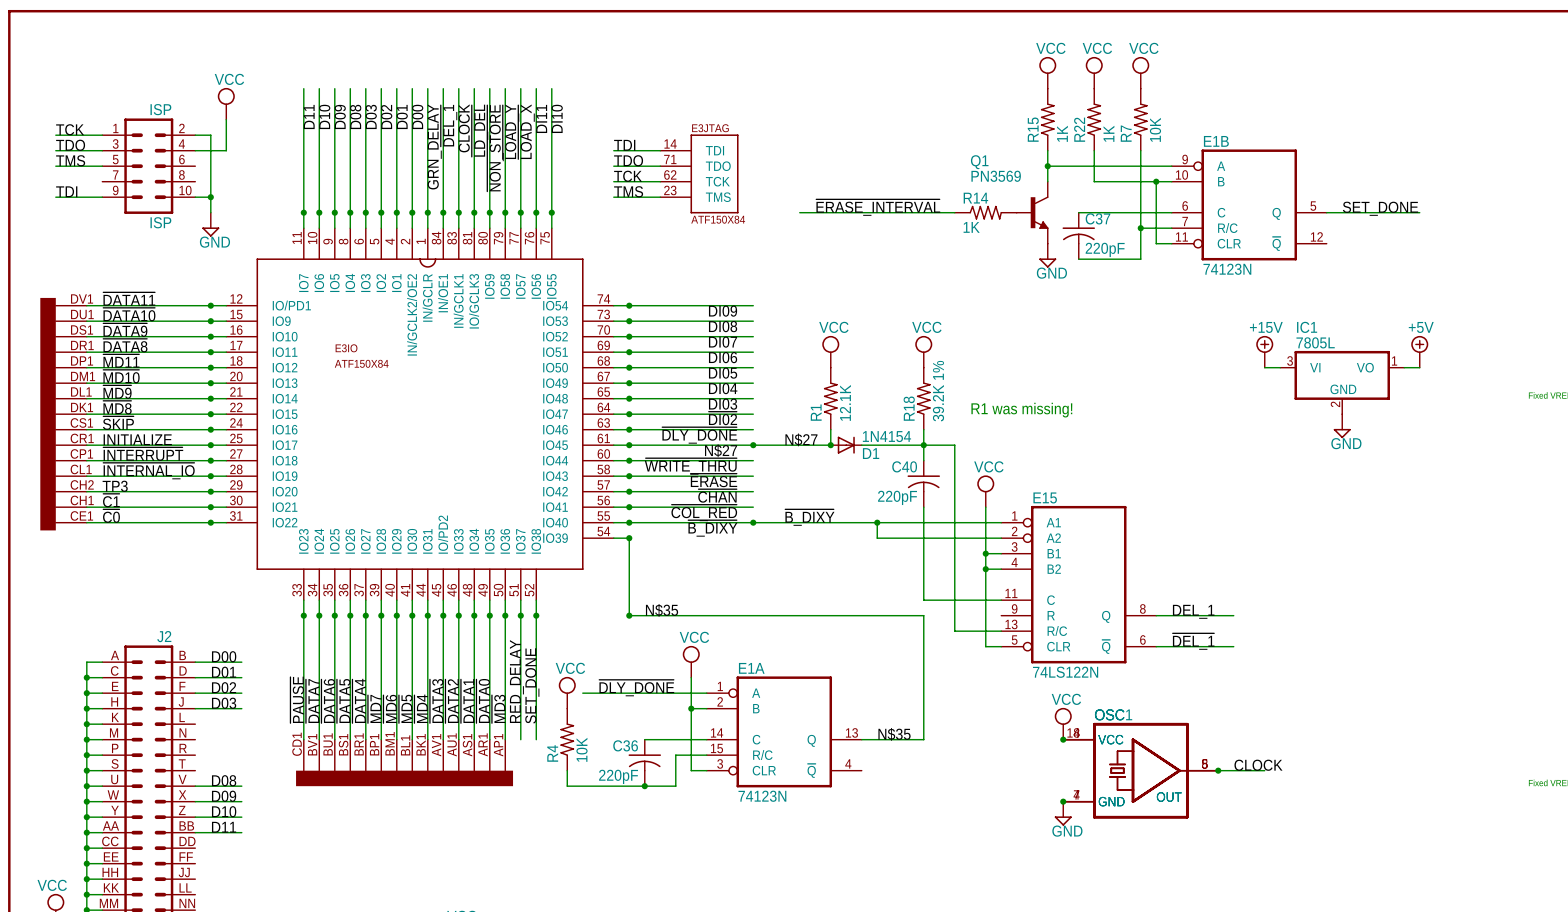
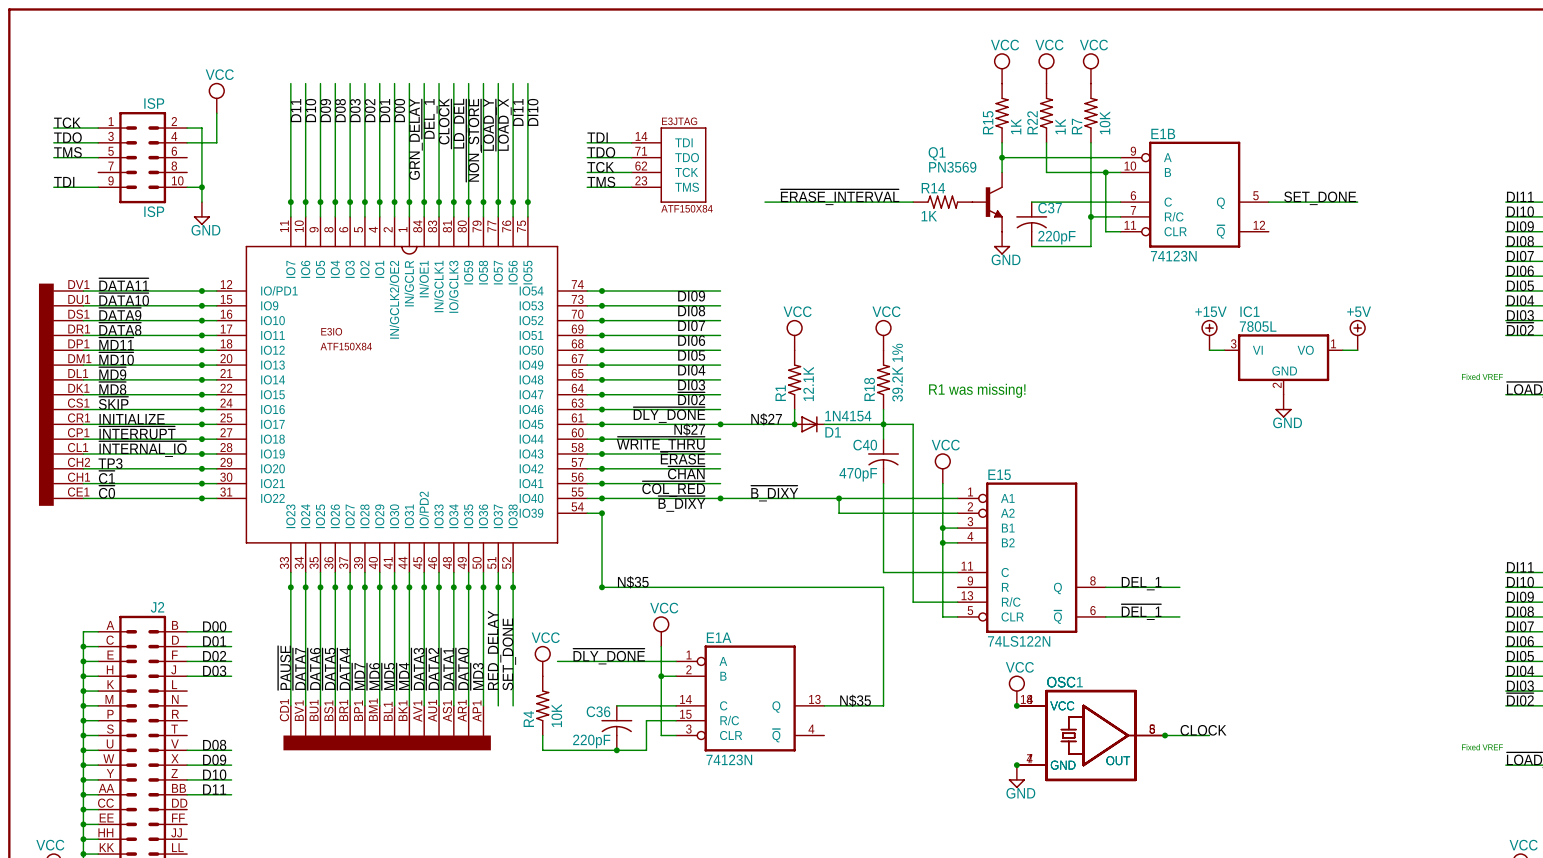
C40 value: 220pF (897, 497) -> 470pF (858, 474)

